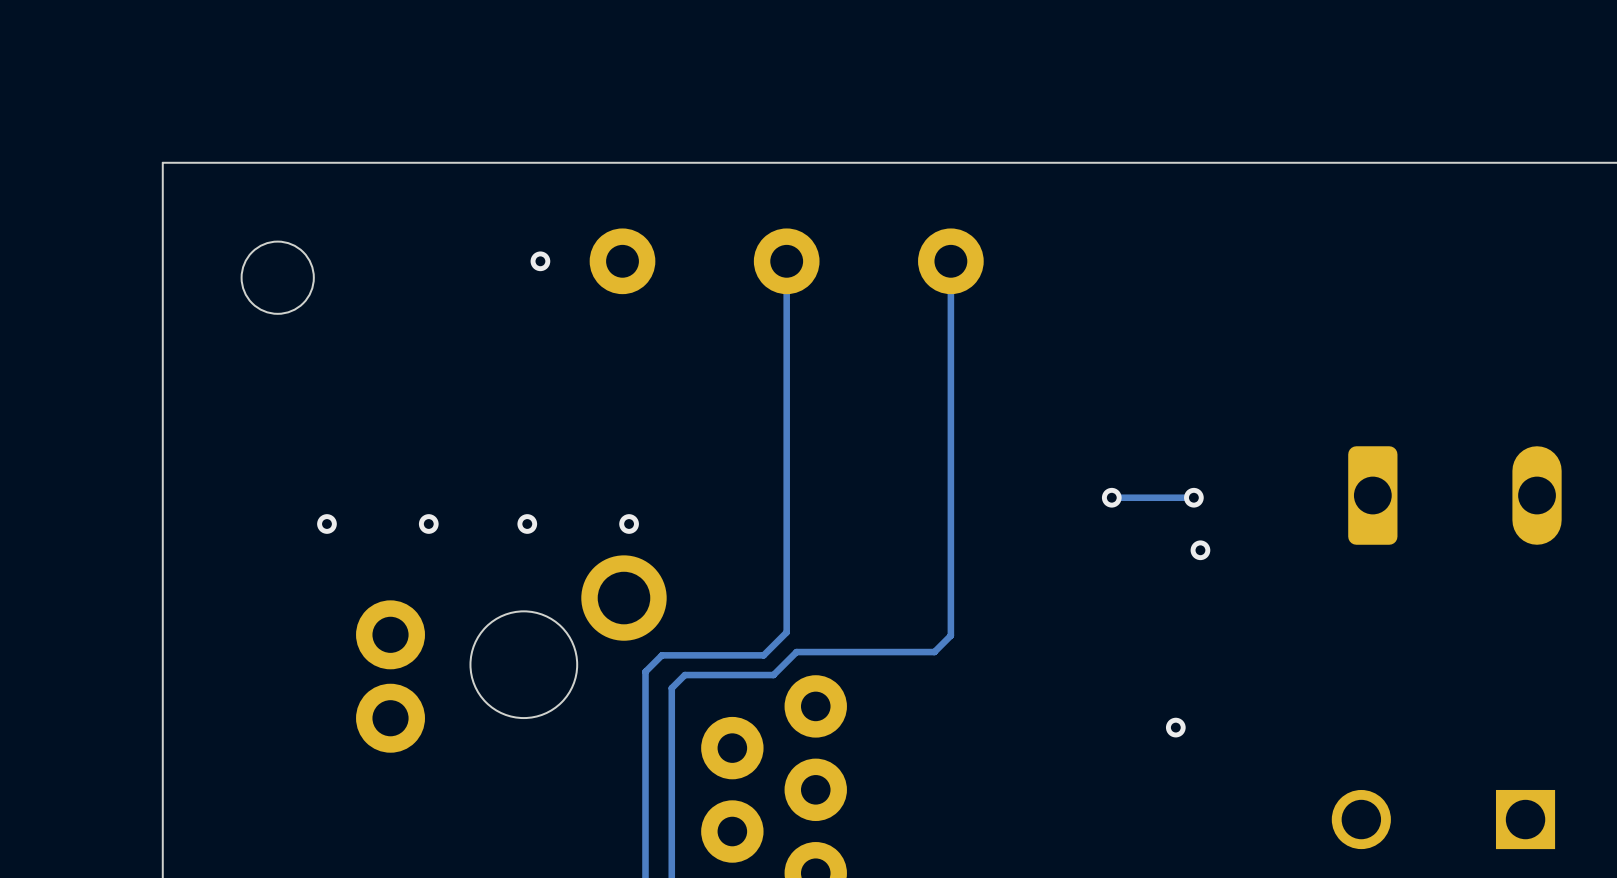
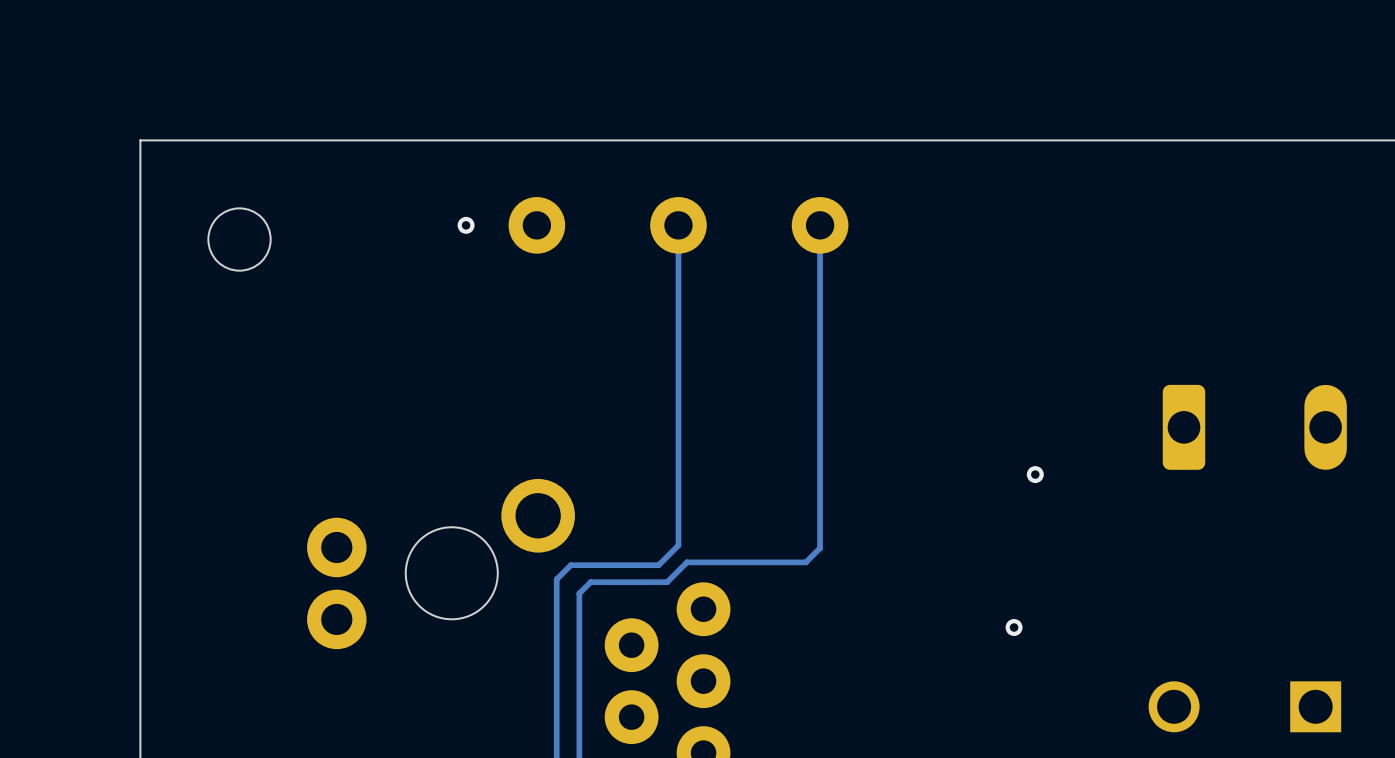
via: (1111, 497) -> none
track: (1193, 497) (1111, 497) -> none
via: (1193, 497) -> none
via: (326, 524) -> none
via: (428, 524) -> none
via: (527, 524) -> none
via: (629, 524) -> none

